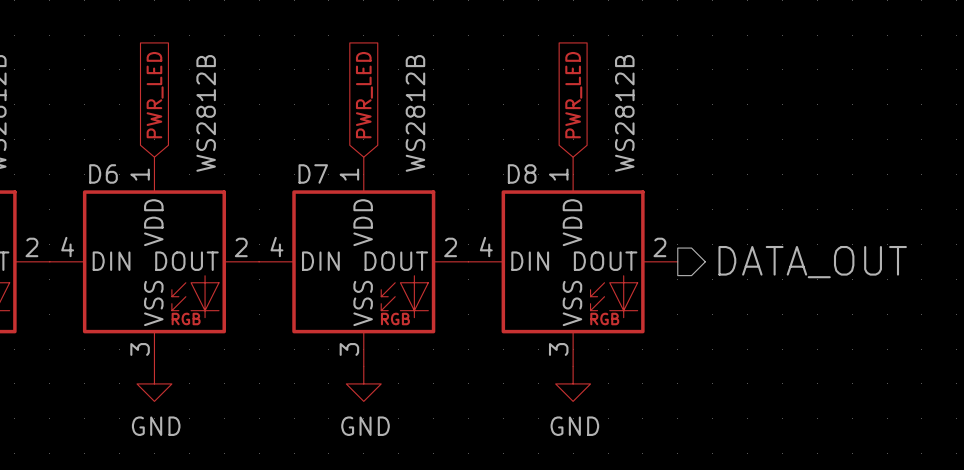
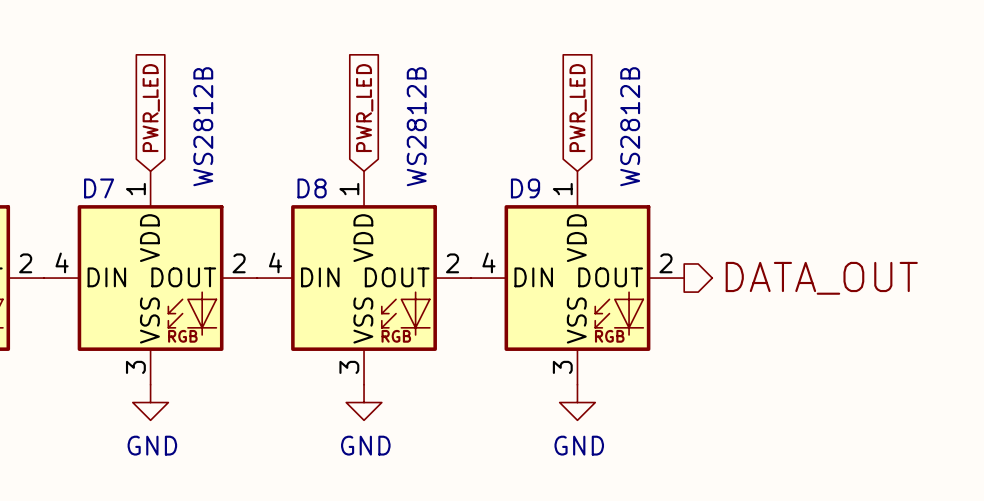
D6 name: D6 (103, 173) -> D7 (99, 188)
D7 name: D7 (313, 173) -> D8 (312, 188)
D8 name: D8 (522, 173) -> D9 (525, 188)

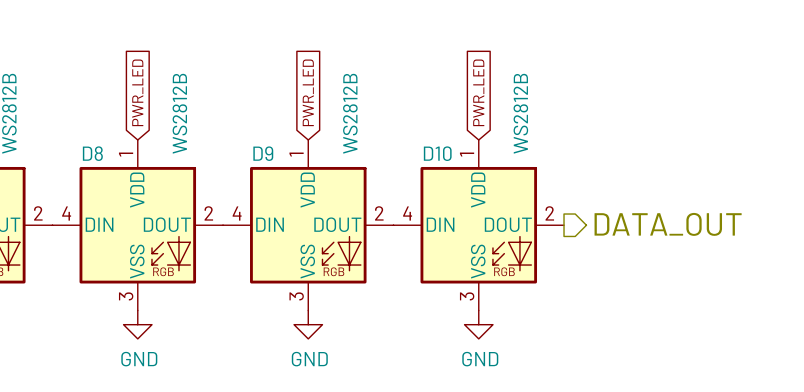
D7 name: D7 (99, 188) -> D8 (92, 153)
D8 name: D8 (312, 188) -> D9 (263, 153)
D9 name: D9 (525, 188) -> D10 (437, 153)

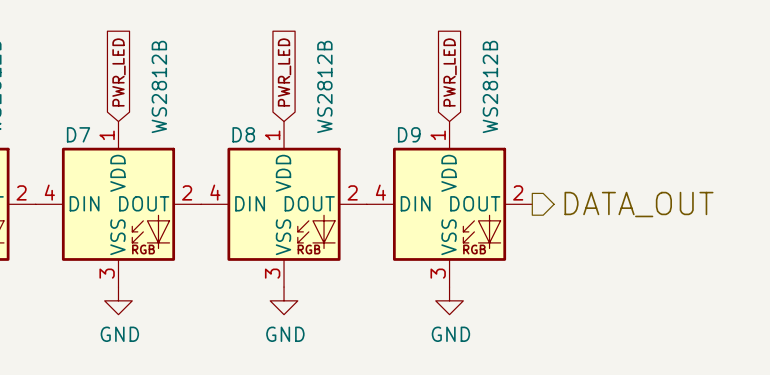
D8 name: D8 (92, 153) -> D7 (78, 134)
D9 name: D9 (263, 153) -> D8 (243, 134)
D10 name: D10 (437, 153) -> D9 (409, 134)

